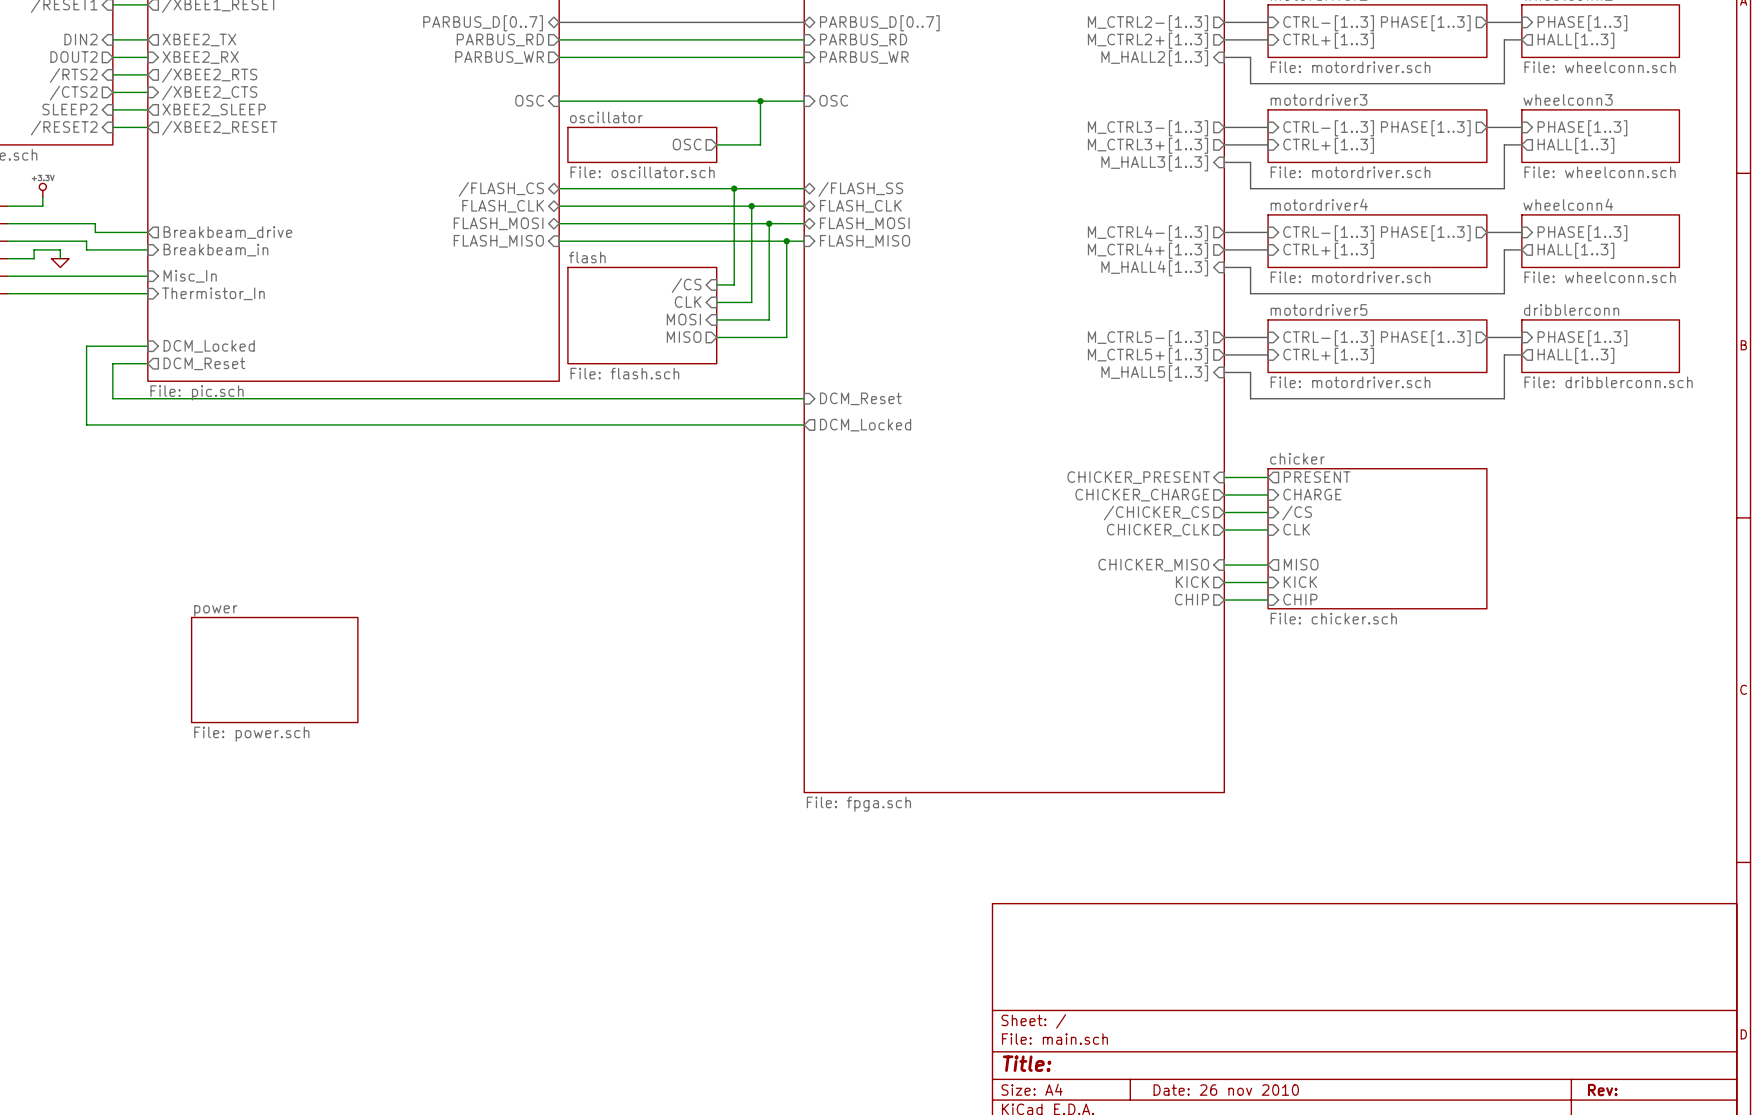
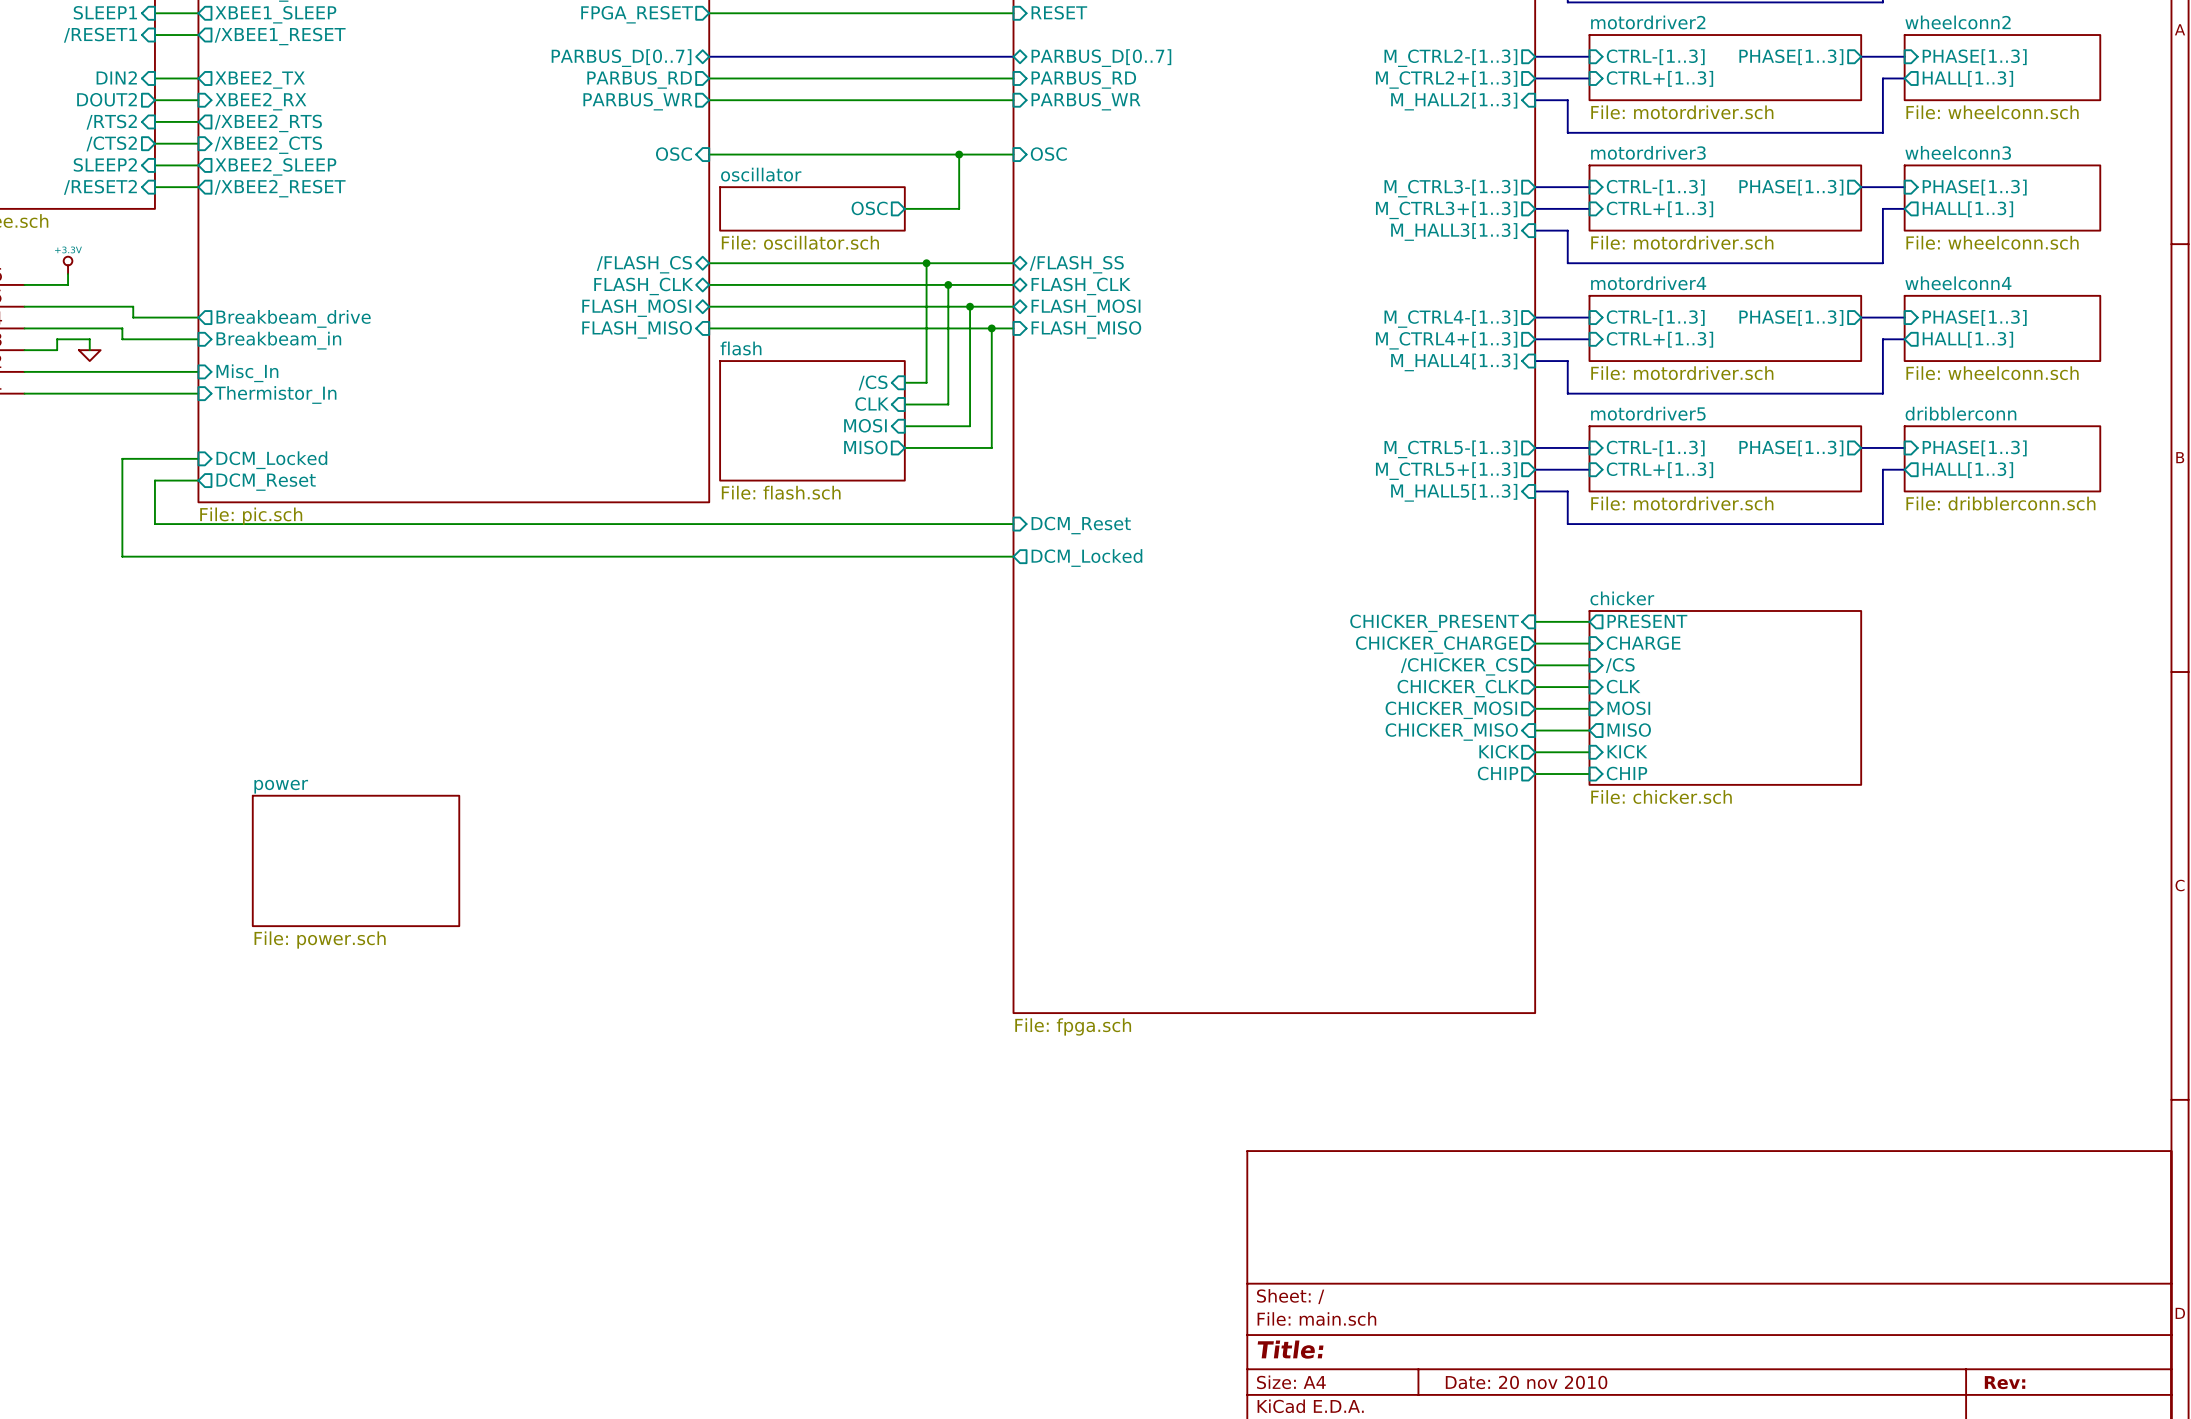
sheet pin: none -> CHICKER_MOSI (1451, 710)
wire: none -> (1535, 708) (1589, 708)
sheet pin: none -> MOSI (1628, 708)
title block: Date: 26 nov 2010 (1226, 1090) -> Date: 20 nov 2010 (1526, 1382)

